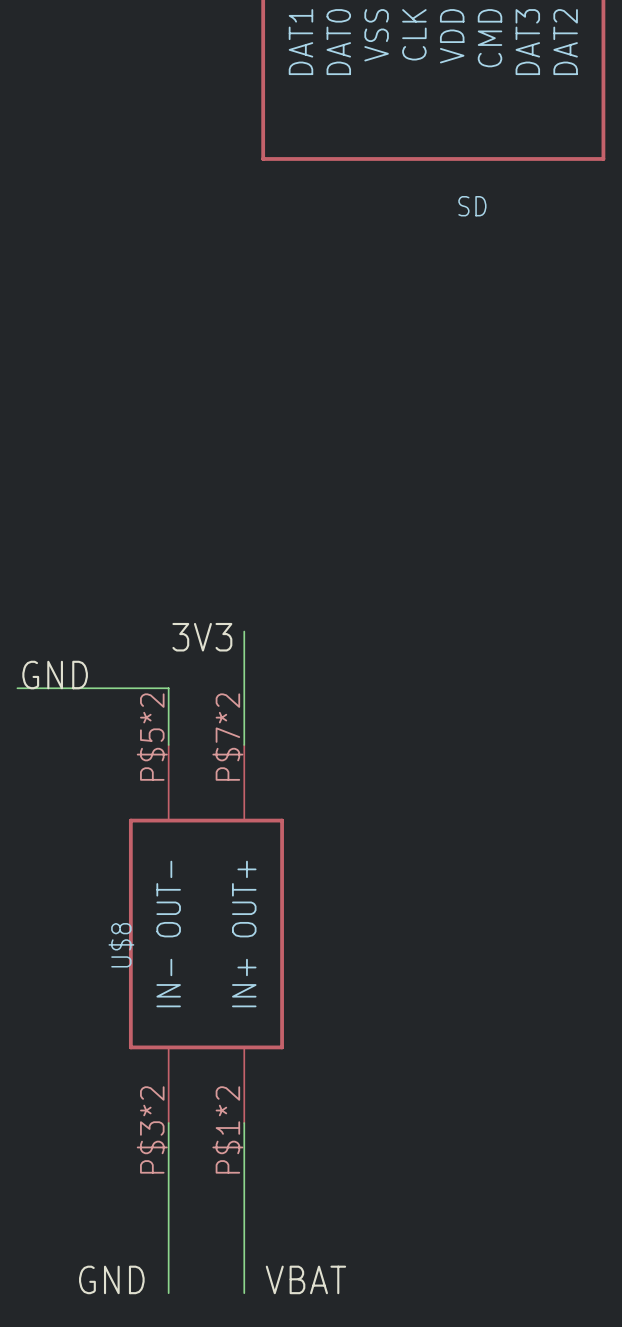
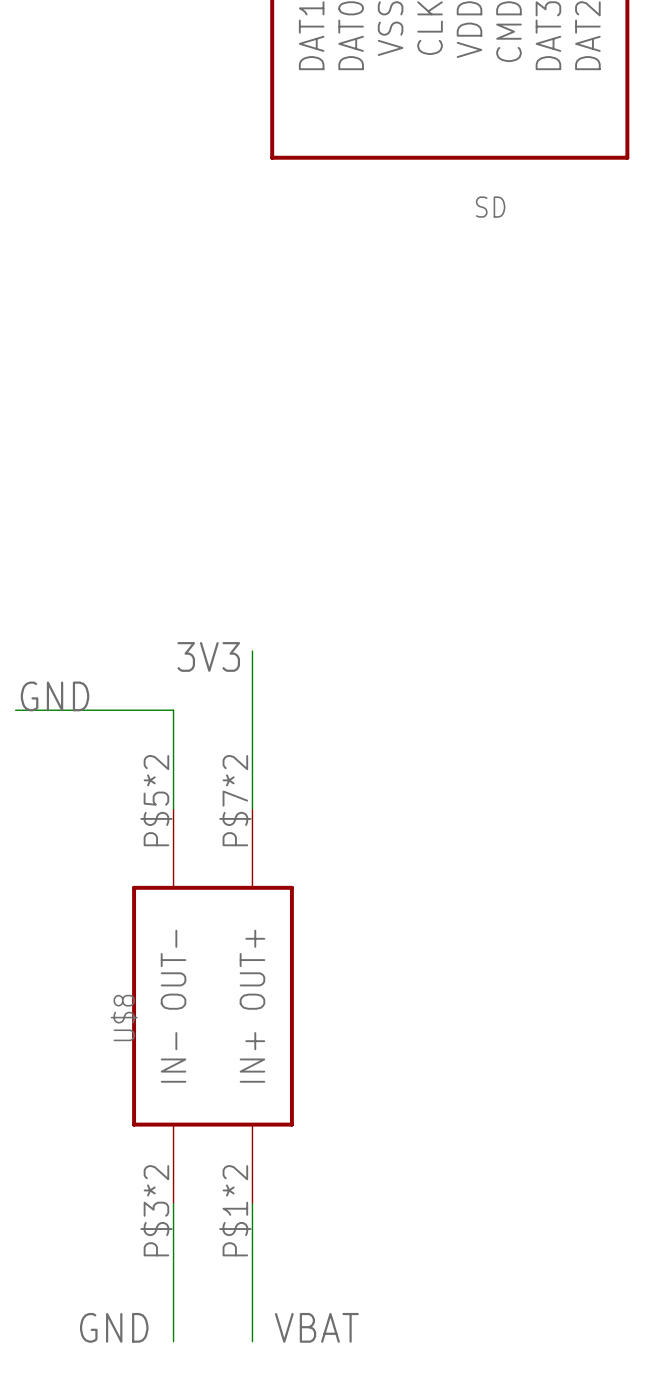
U$8 position: (206, 934) -> (212, 1006)

